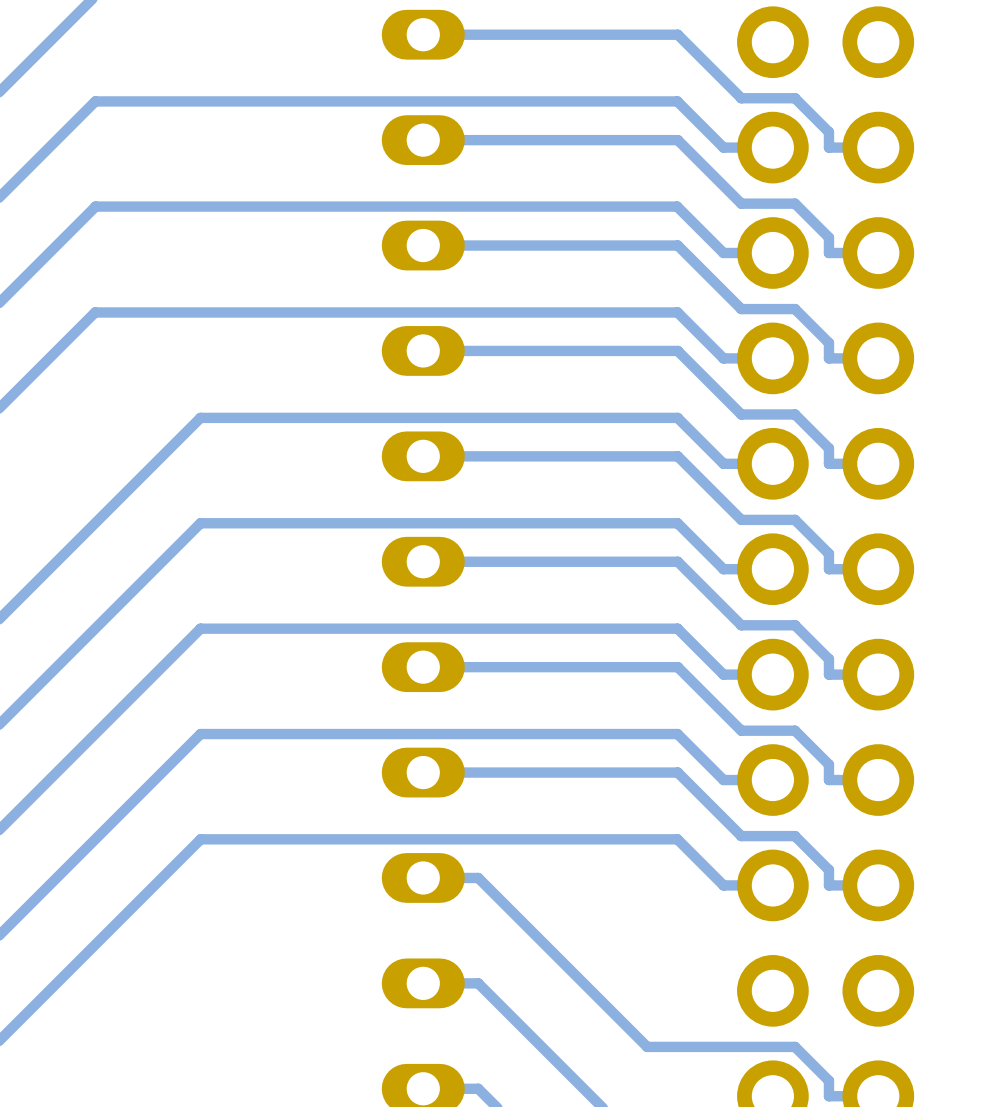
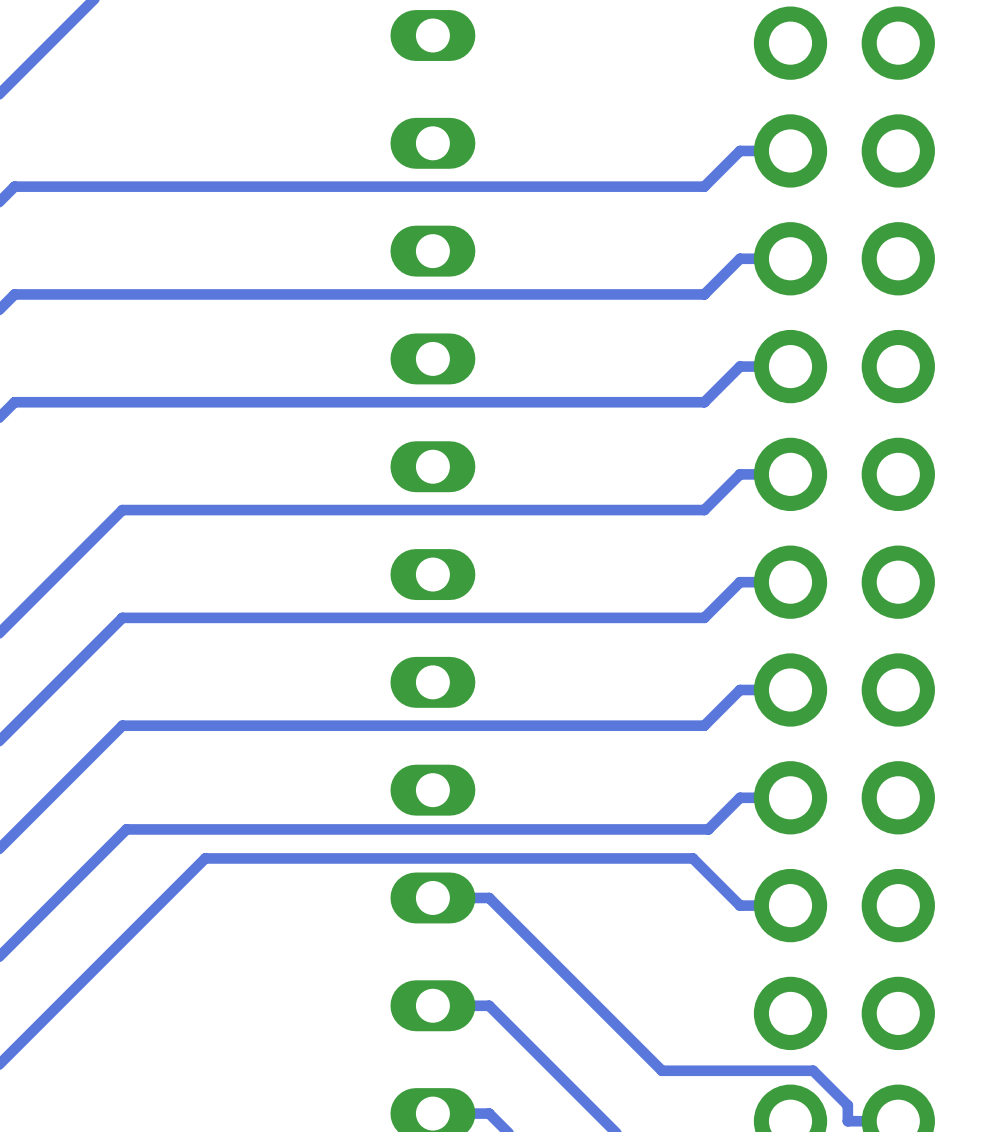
track: (423, 34) (677, 34) (741, 98) (795, 98) (828, 132) (828, 147) (878, 147) -> none
track: (423, 140) (677, 140) (741, 203) (795, 203) (828, 237) (828, 253) (878, 253) -> none
track: (723, 147) (677, 101) (95, 101) (14, 182) -> (740, 150) (704, 186) (14, 186)
track: (423, 245) (677, 245) (741, 309) (795, 309) (828, 342) (828, 358) (878, 358) -> none
track: (723, 253) (677, 206) (95, 206) (14, 287) -> (740, 258) (704, 294) (14, 294)
track: (423, 350) (677, 350) (741, 414) (795, 414) (828, 448) (828, 463) (878, 463) -> none
track: (723, 358) (677, 312) (95, 312) (14, 393) -> (740, 366) (704, 402) (14, 402)
track: (423, 456) (677, 456) (741, 519) (795, 519) (828, 553) (828, 569) (878, 569) -> none
track: (723, 463) (677, 417) (200, 417) (119, 498) -> (740, 474) (704, 510) (122, 510)
track: (423, 561) (677, 561) (741, 625) (795, 625) (828, 659) (828, 674) (878, 674) -> none
track: (723, 569) (677, 523) (200, 523) (119, 604) -> (740, 582) (704, 617) (122, 617)
track: (423, 667) (677, 667) (741, 730) (795, 730) (828, 764) (828, 780) (878, 780) -> none
track: (723, 674) (677, 628) (200, 628) (119, 709) -> (740, 689) (704, 725) (122, 725)
track: (423, 772) (677, 772) (741, 836) (795, 836) (828, 870) (828, 885) (878, 885) -> none
track: (723, 780) (677, 734) (200, 734) (123, 810) -> (740, 797) (708, 829) (126, 829)

